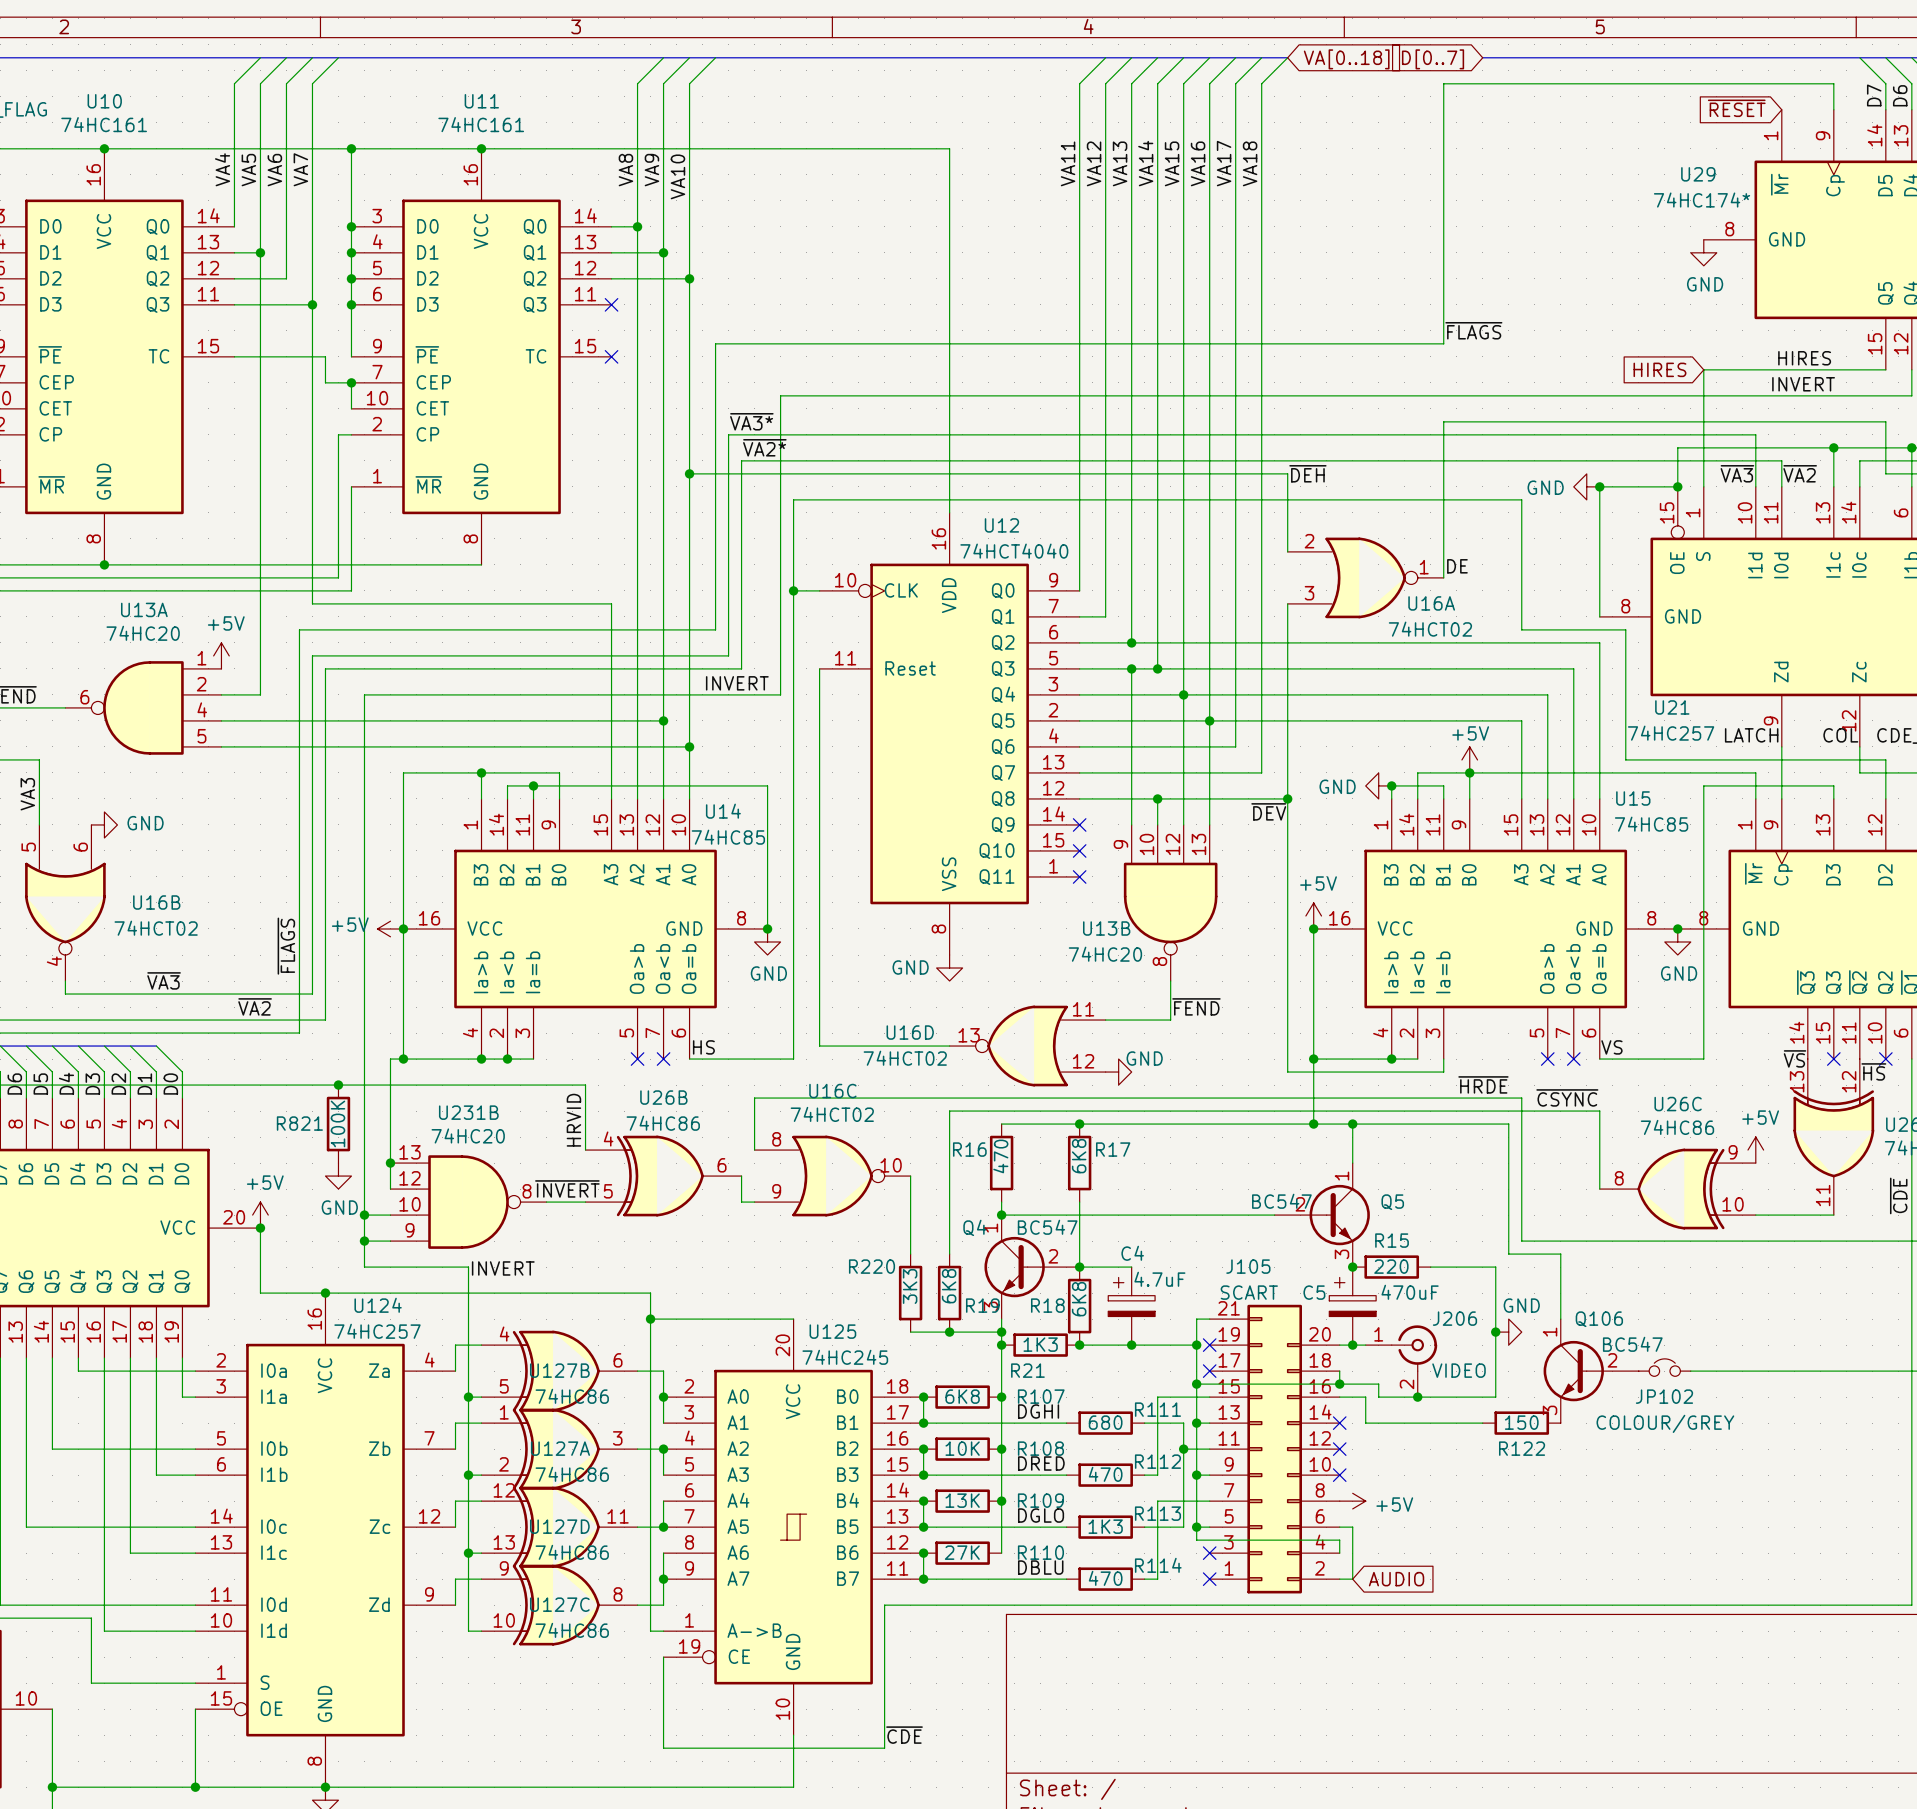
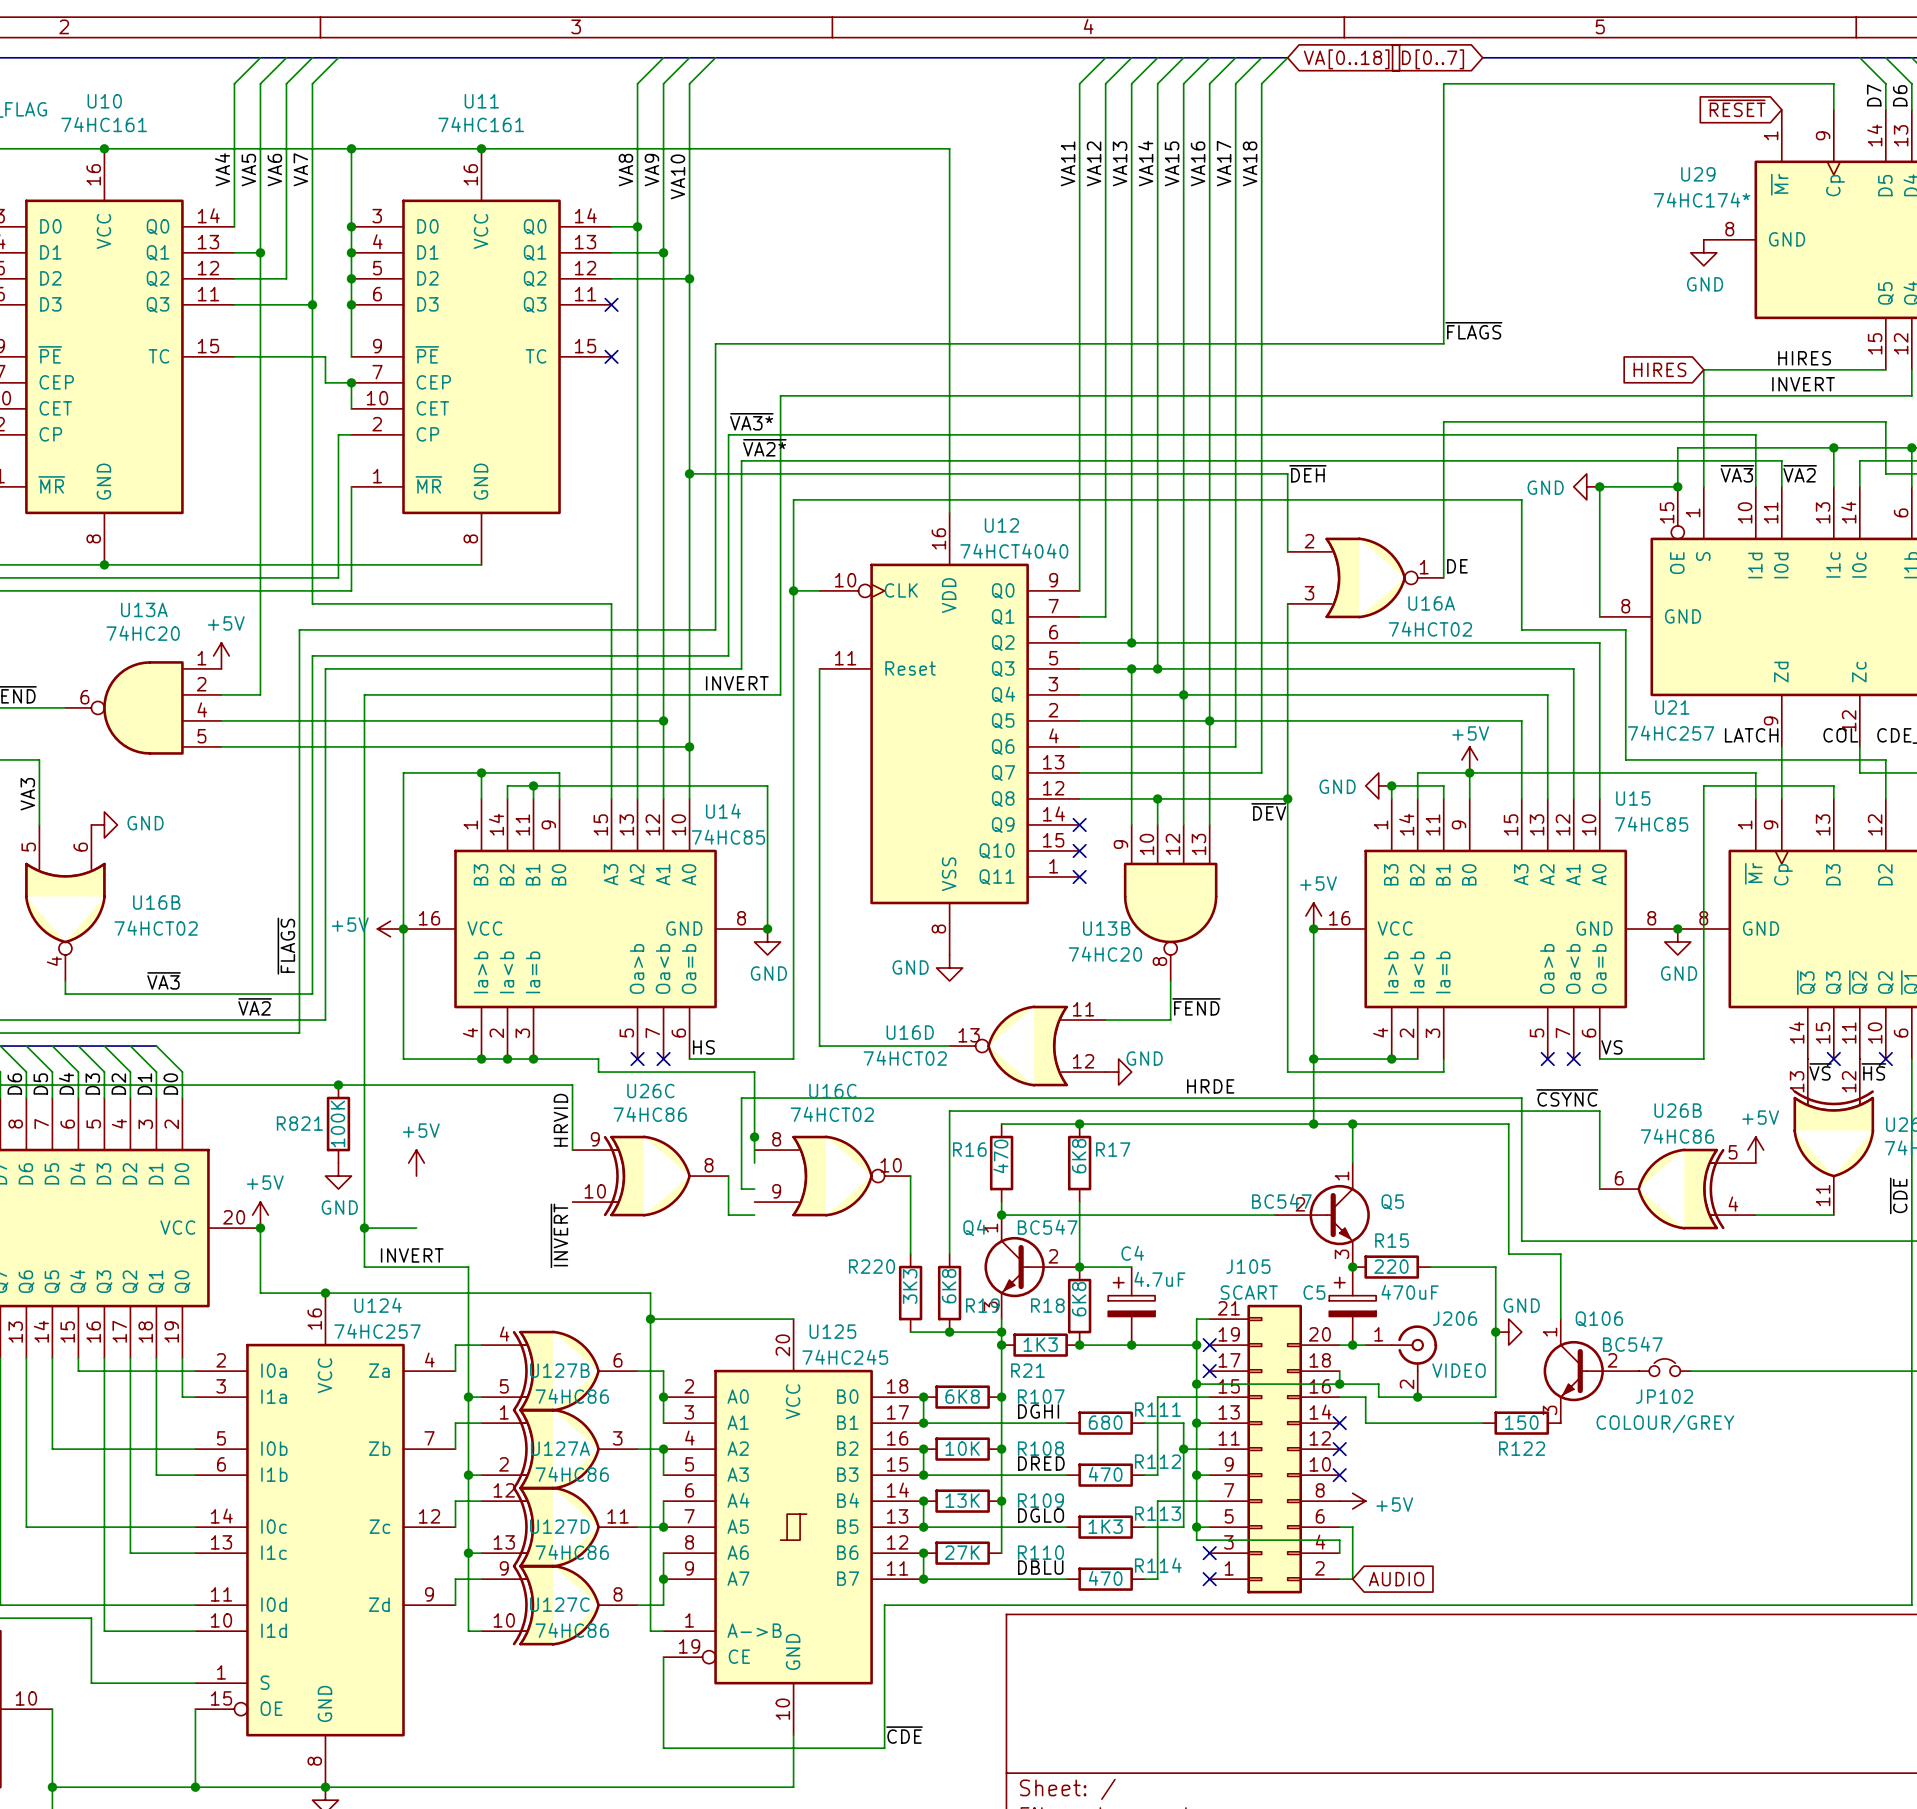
label position: ~{VS} (1794, 1058) -> ~{VS} (1820, 1071)
wire: (403, 1059) (390, 1059) (390, 1189) -> none
junction: (403, 1059) -> none
wire: none -> (533, 1059) (598, 1059) (598, 1072) (754, 1072) (754, 1098) (741, 1098) (741, 1176)
junction: none -> (533, 1059)
label: ~{HRDE} (1483, 1084) -> none
wire: (572, 1085) (585, 1085) (585, 1150) -> (572, 1085) (572, 1150)
label: none -> HRDE (1210, 1086)
label position: HRVID (573, 1120) -> HRVID (560, 1120)
junction: none -> (754, 1137)
wire: none -> (754, 1150) (754, 1163)
junction: (390, 1163) -> none
power symbol: none -> +5V (416, 1163)
U26B rotation: 0° (660, 1176) -> 180° (1680, 1189)
U26B position: (663, 1176) -> (1677, 1189)
wire: none -> (728, 1176) (728, 1215) (754, 1215)
label rotation: 0° (567, 1188) -> 90° counterclockwise (559, 1235)
wire: (741, 1189) (741, 1202) (754, 1202) -> (741, 1189) (754, 1189)
U26C position: (1677, 1189) -> (650, 1176)
U26C flip: as is (1680, 1189) -> left-right (647, 1176)
U231B: 74HC20 (468, 1202) -> none
wire: (546, 1202) (585, 1202) -> none
wire: (364, 1215) (390, 1215) -> none
junction: (364, 1215) -> none
wire: none -> (364, 1228) (416, 1228)
junction: none -> (364, 1228)
wire: (364, 1241) (390, 1241) -> none
junction: (364, 1241) -> none
label position: INVERT (503, 1268) -> INVERT (412, 1255)

